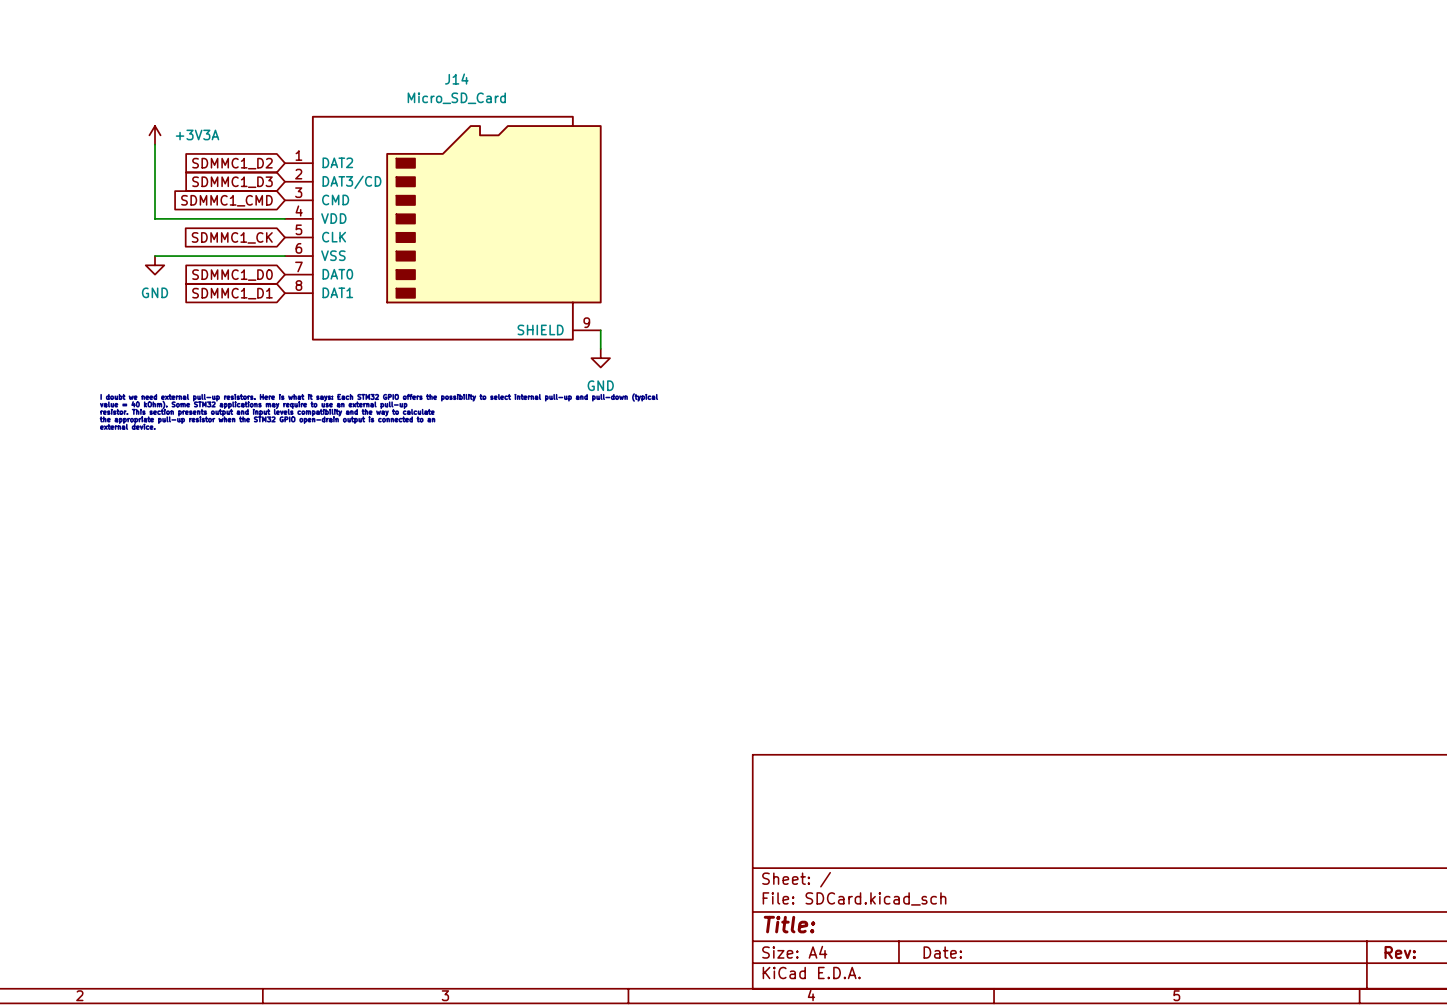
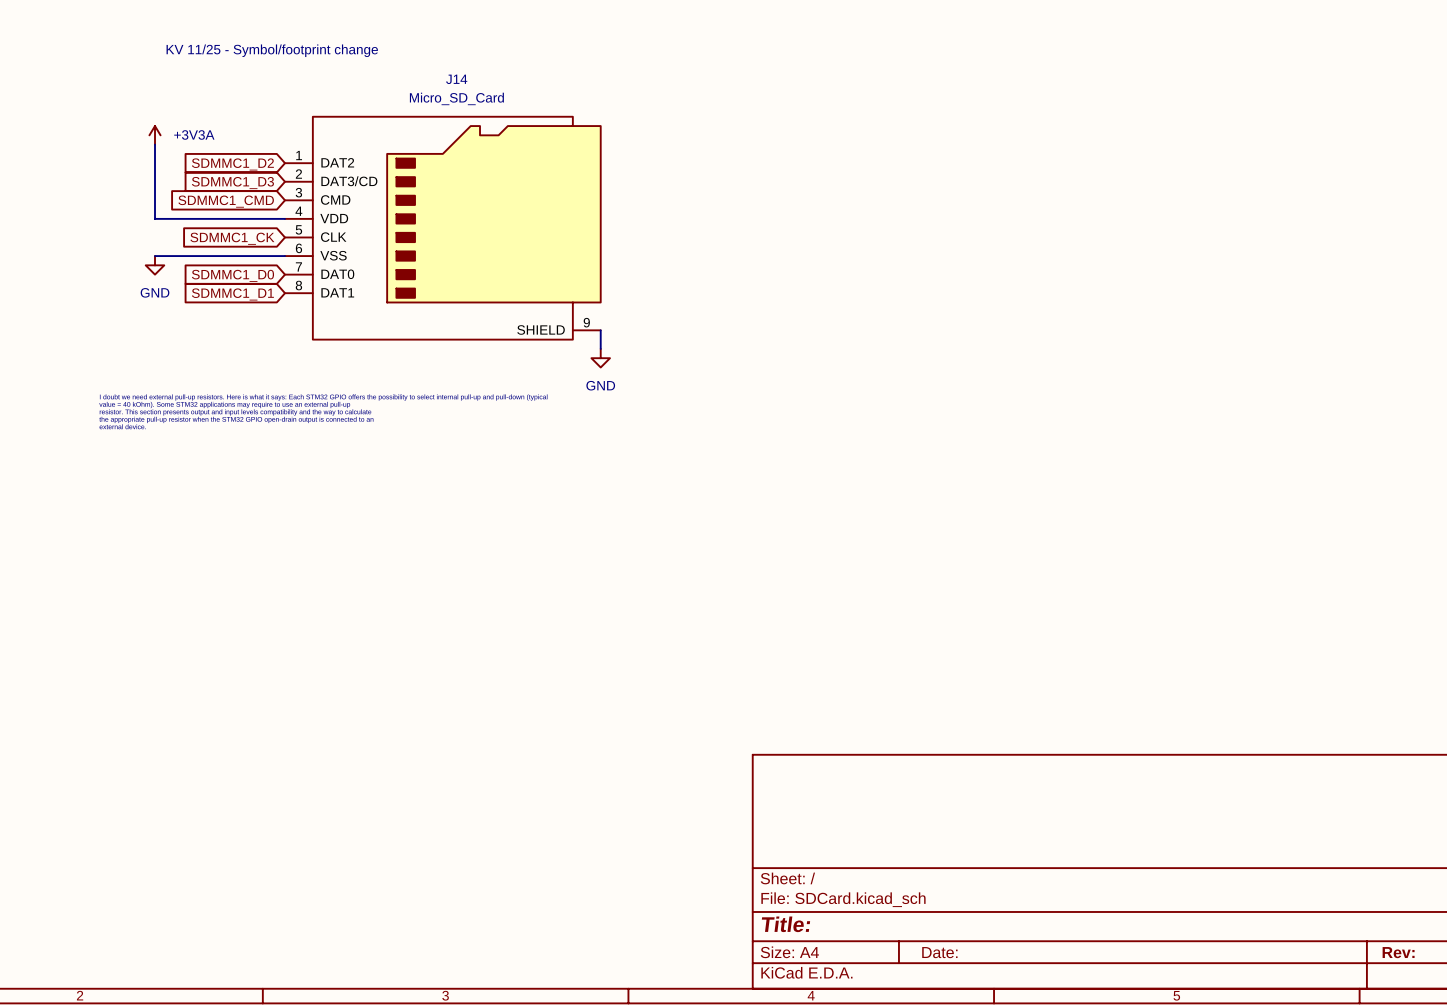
text: none -> KV 11/25 - Symbol/footprint change (272, 50)

